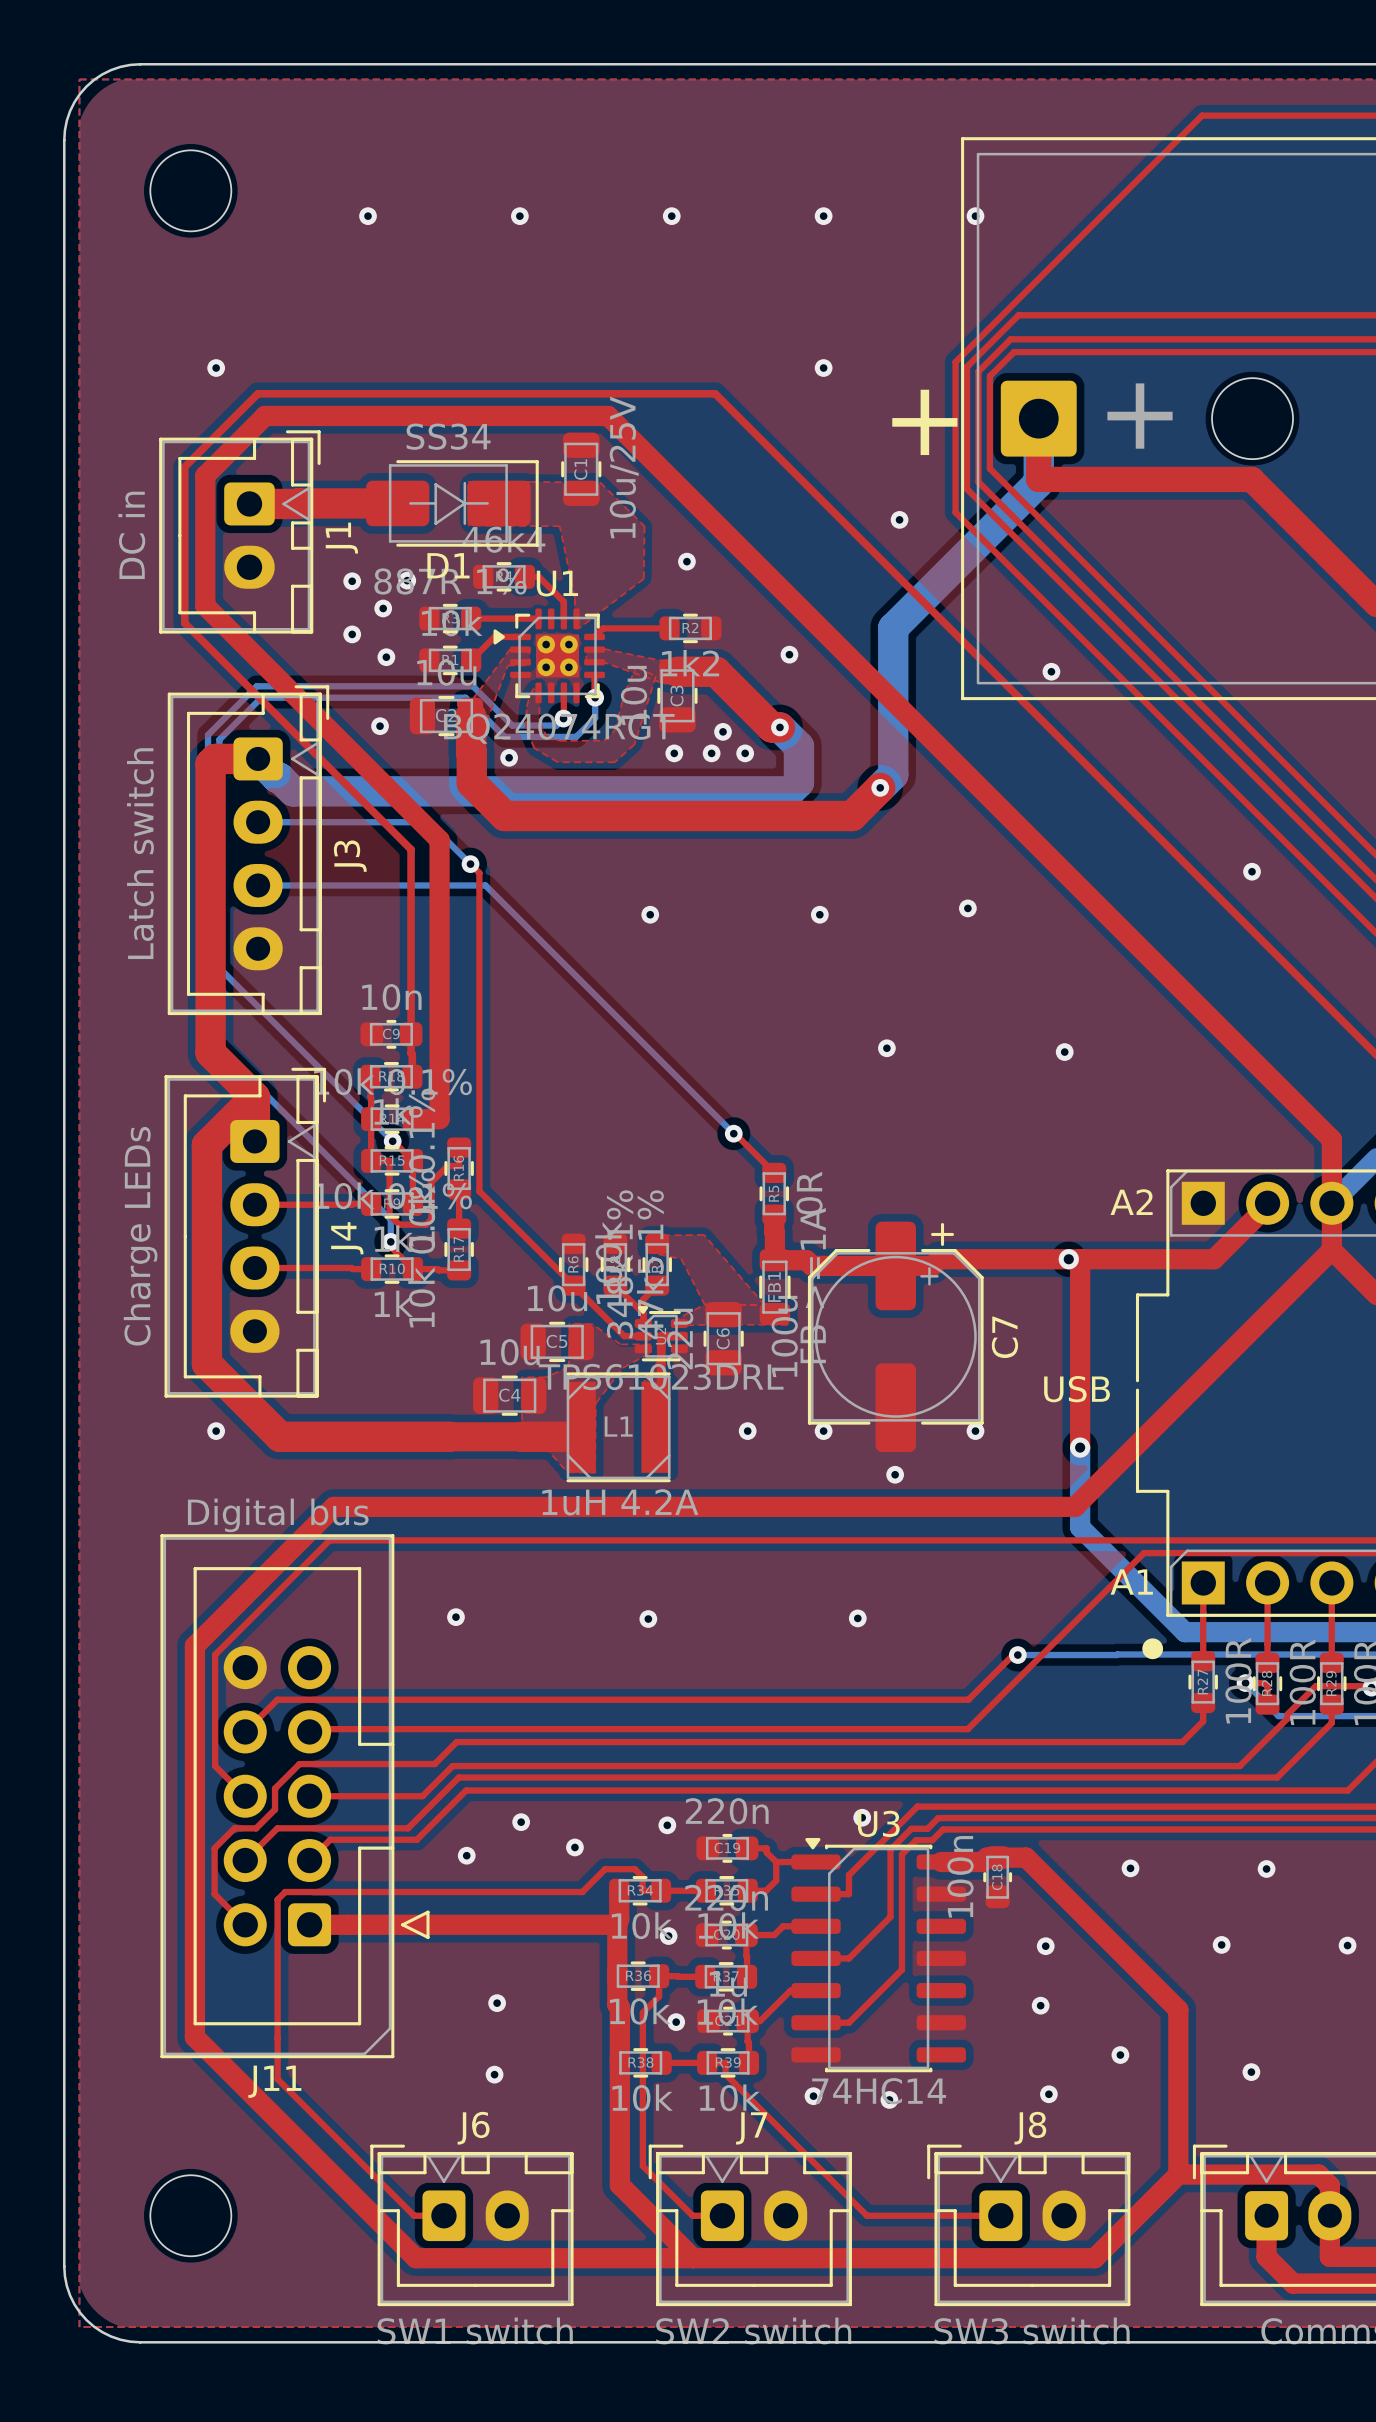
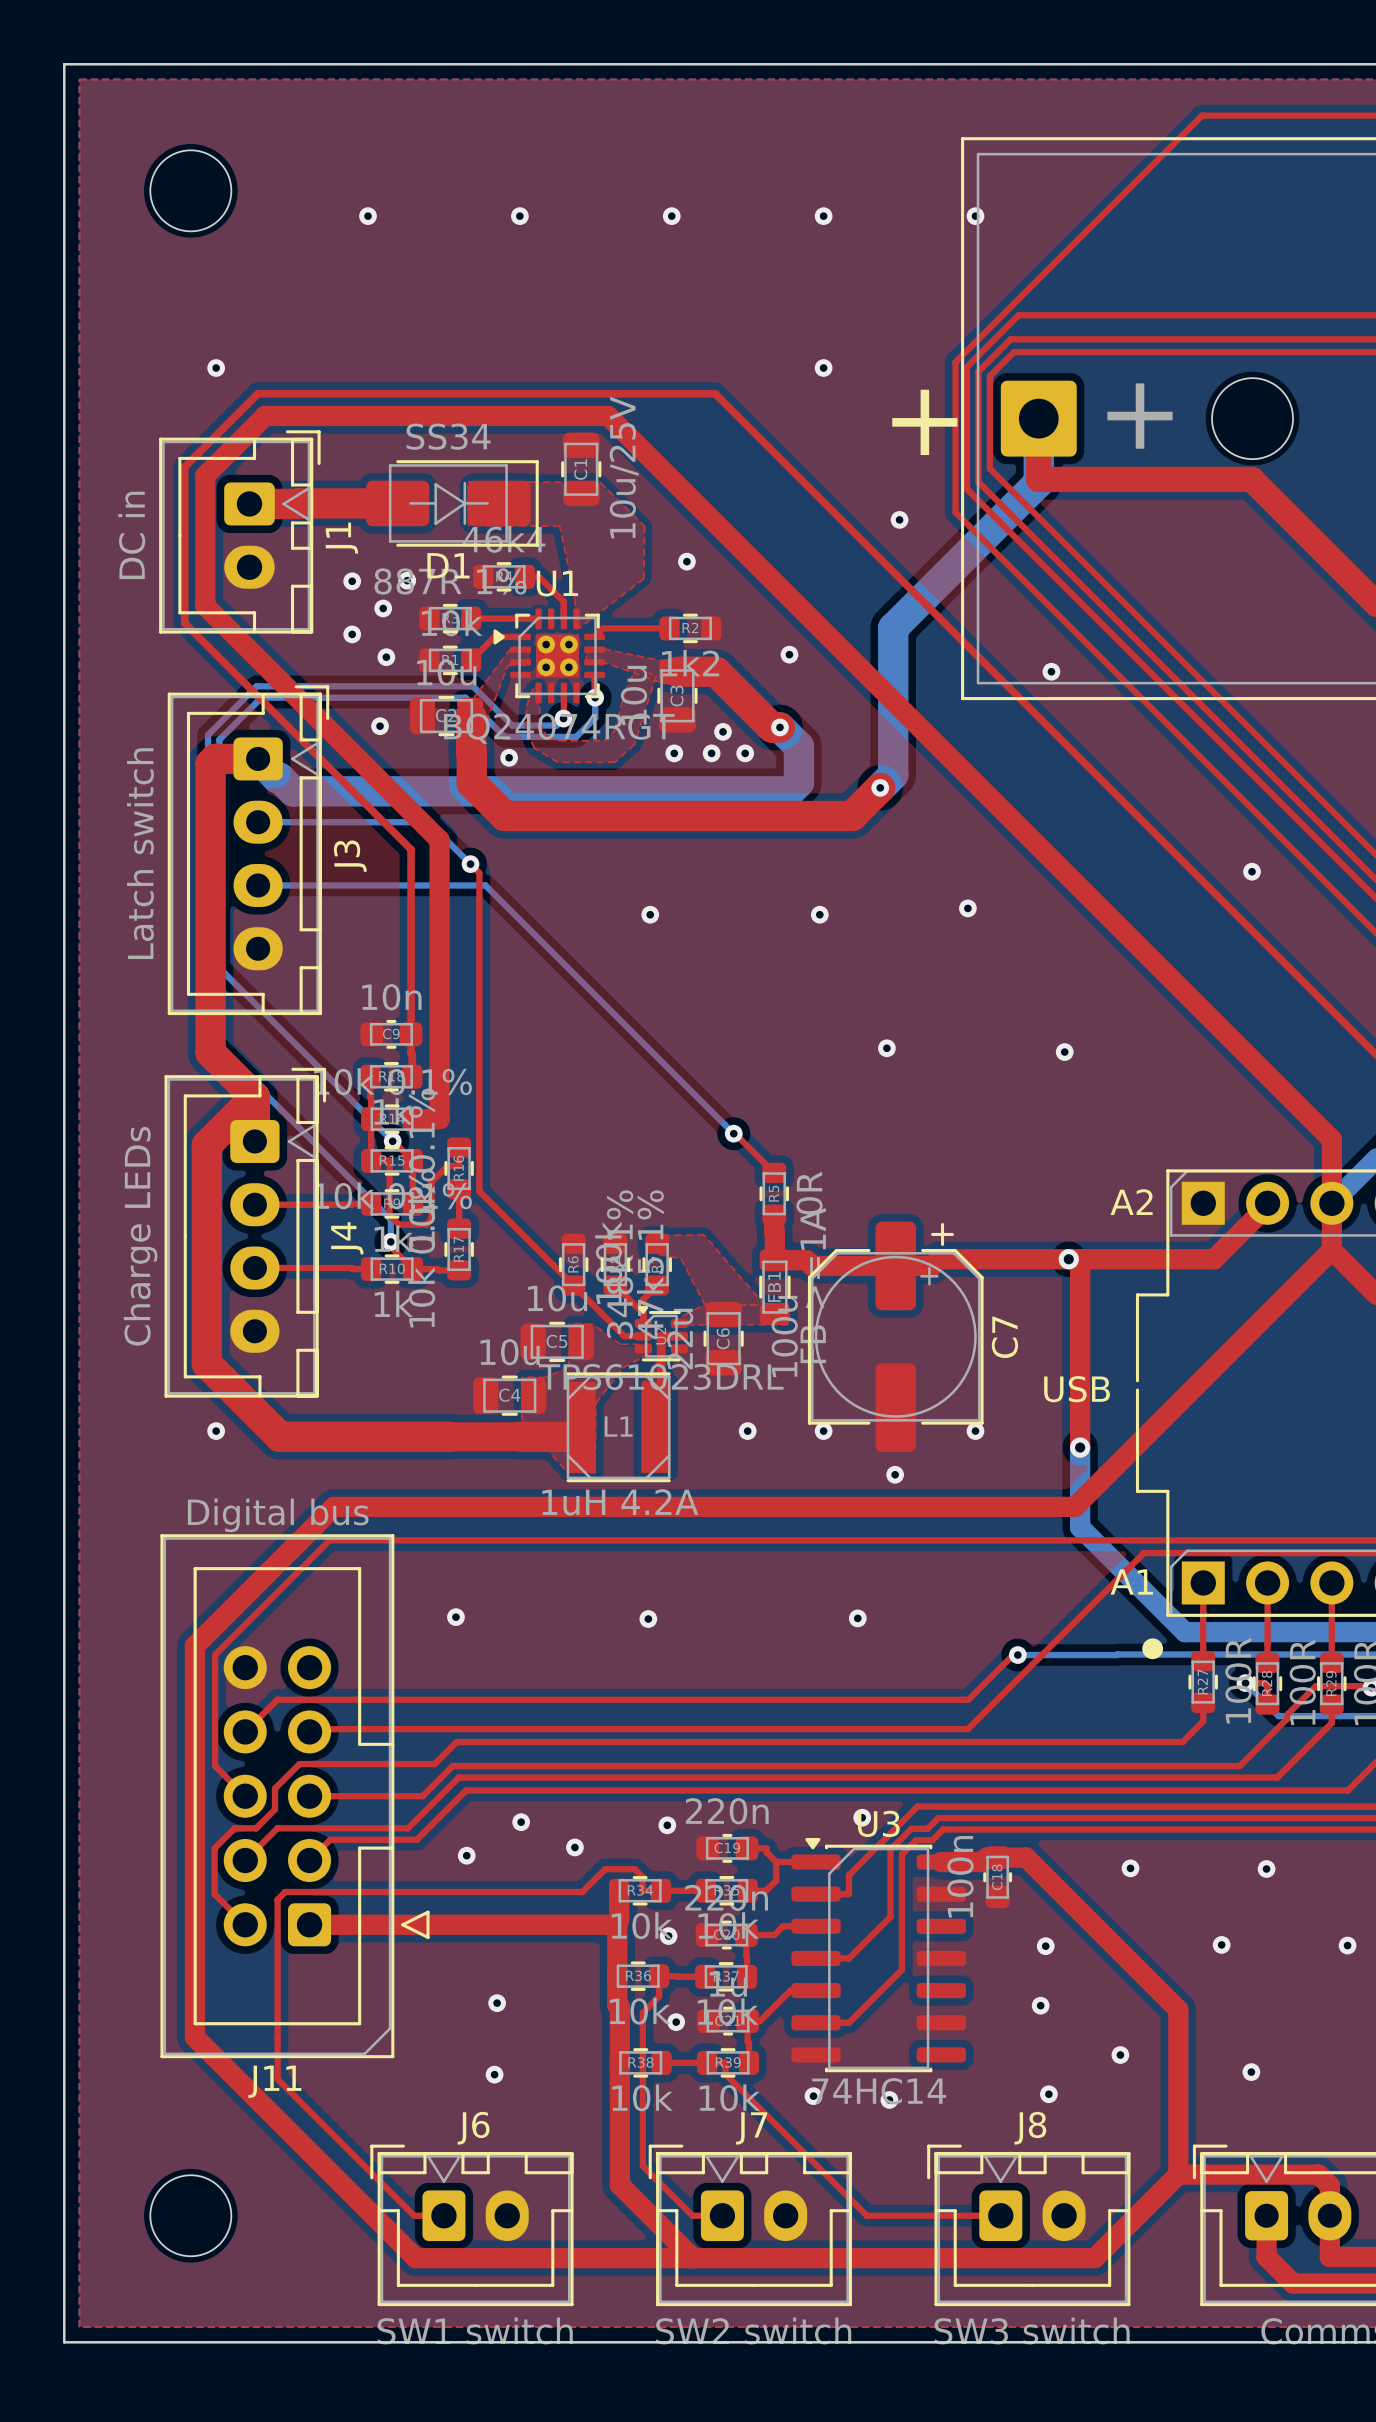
board edge: (140, 64) (111, 70) (86, 86) (70, 111) (64, 140) -> (140, 64) (64, 64) (64, 140)
board edge: (64, 2266) (70, 2295) (86, 2320) (111, 2336) (140, 2342) -> (64, 2266) (64, 2342) (140, 2342)

